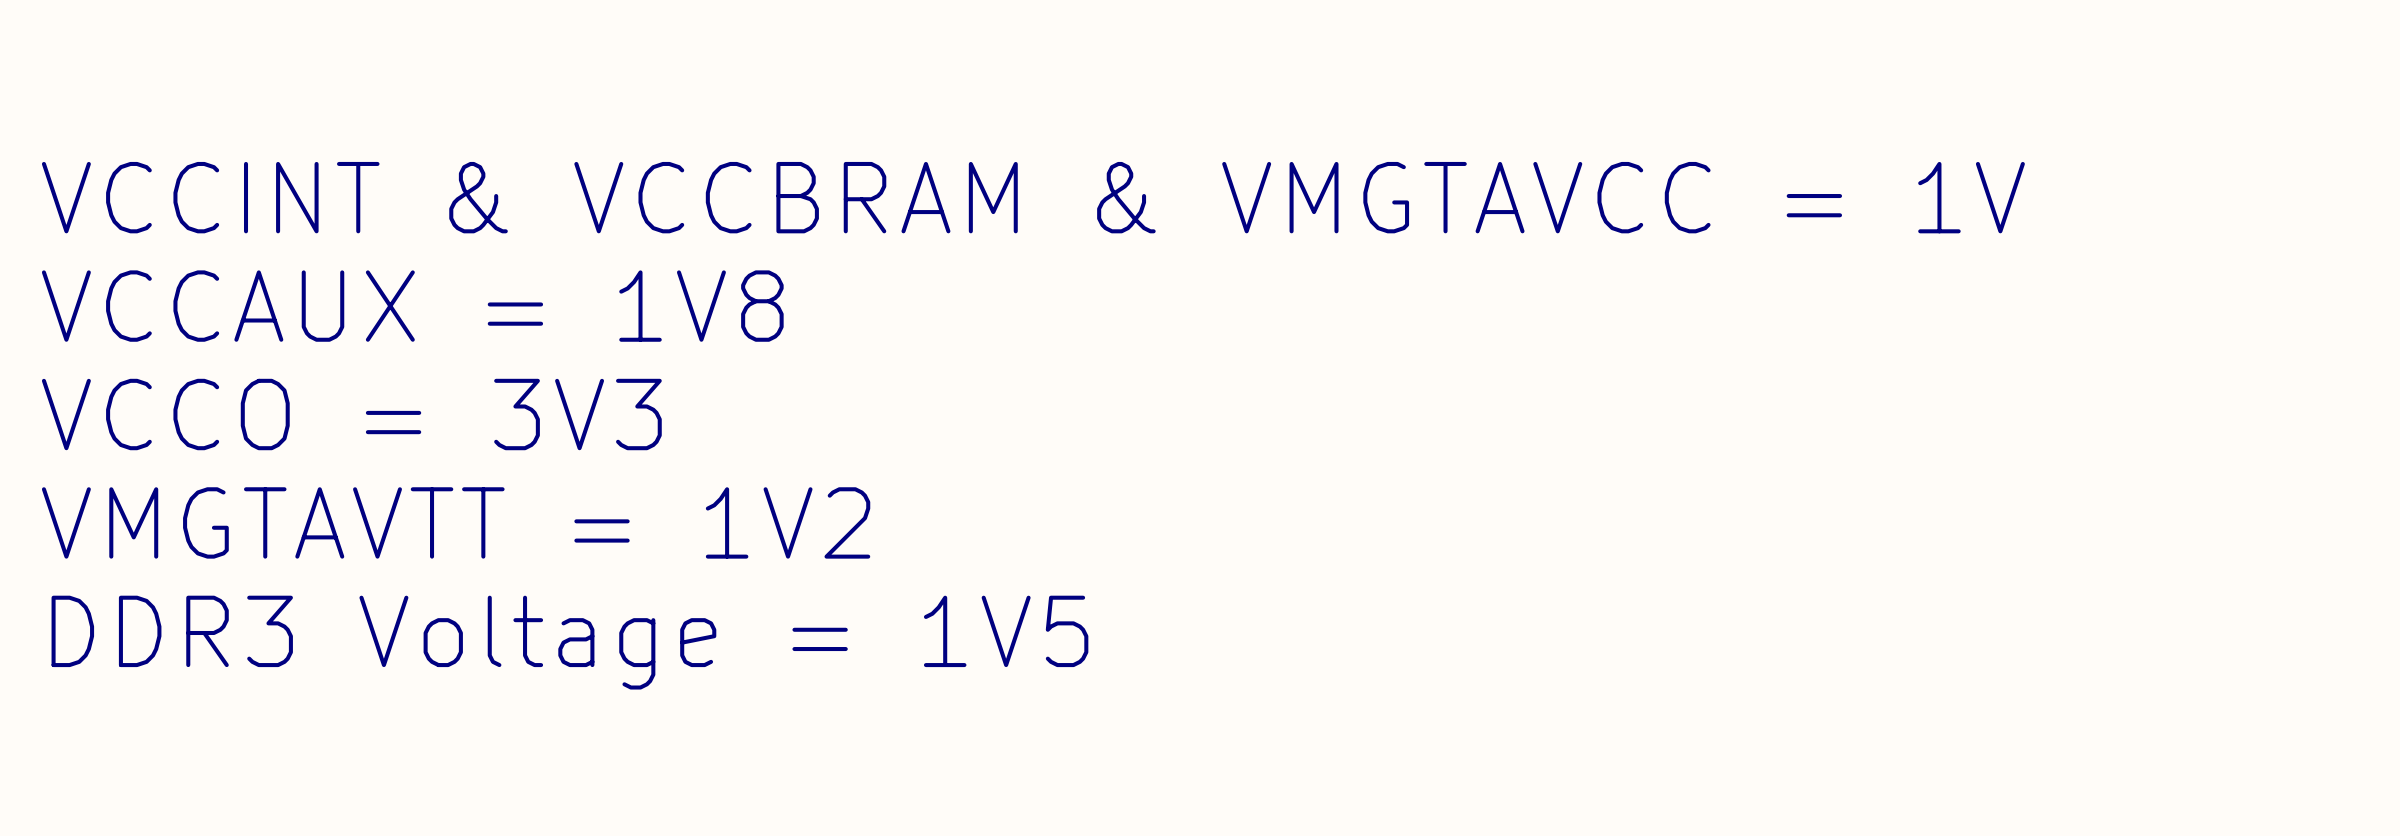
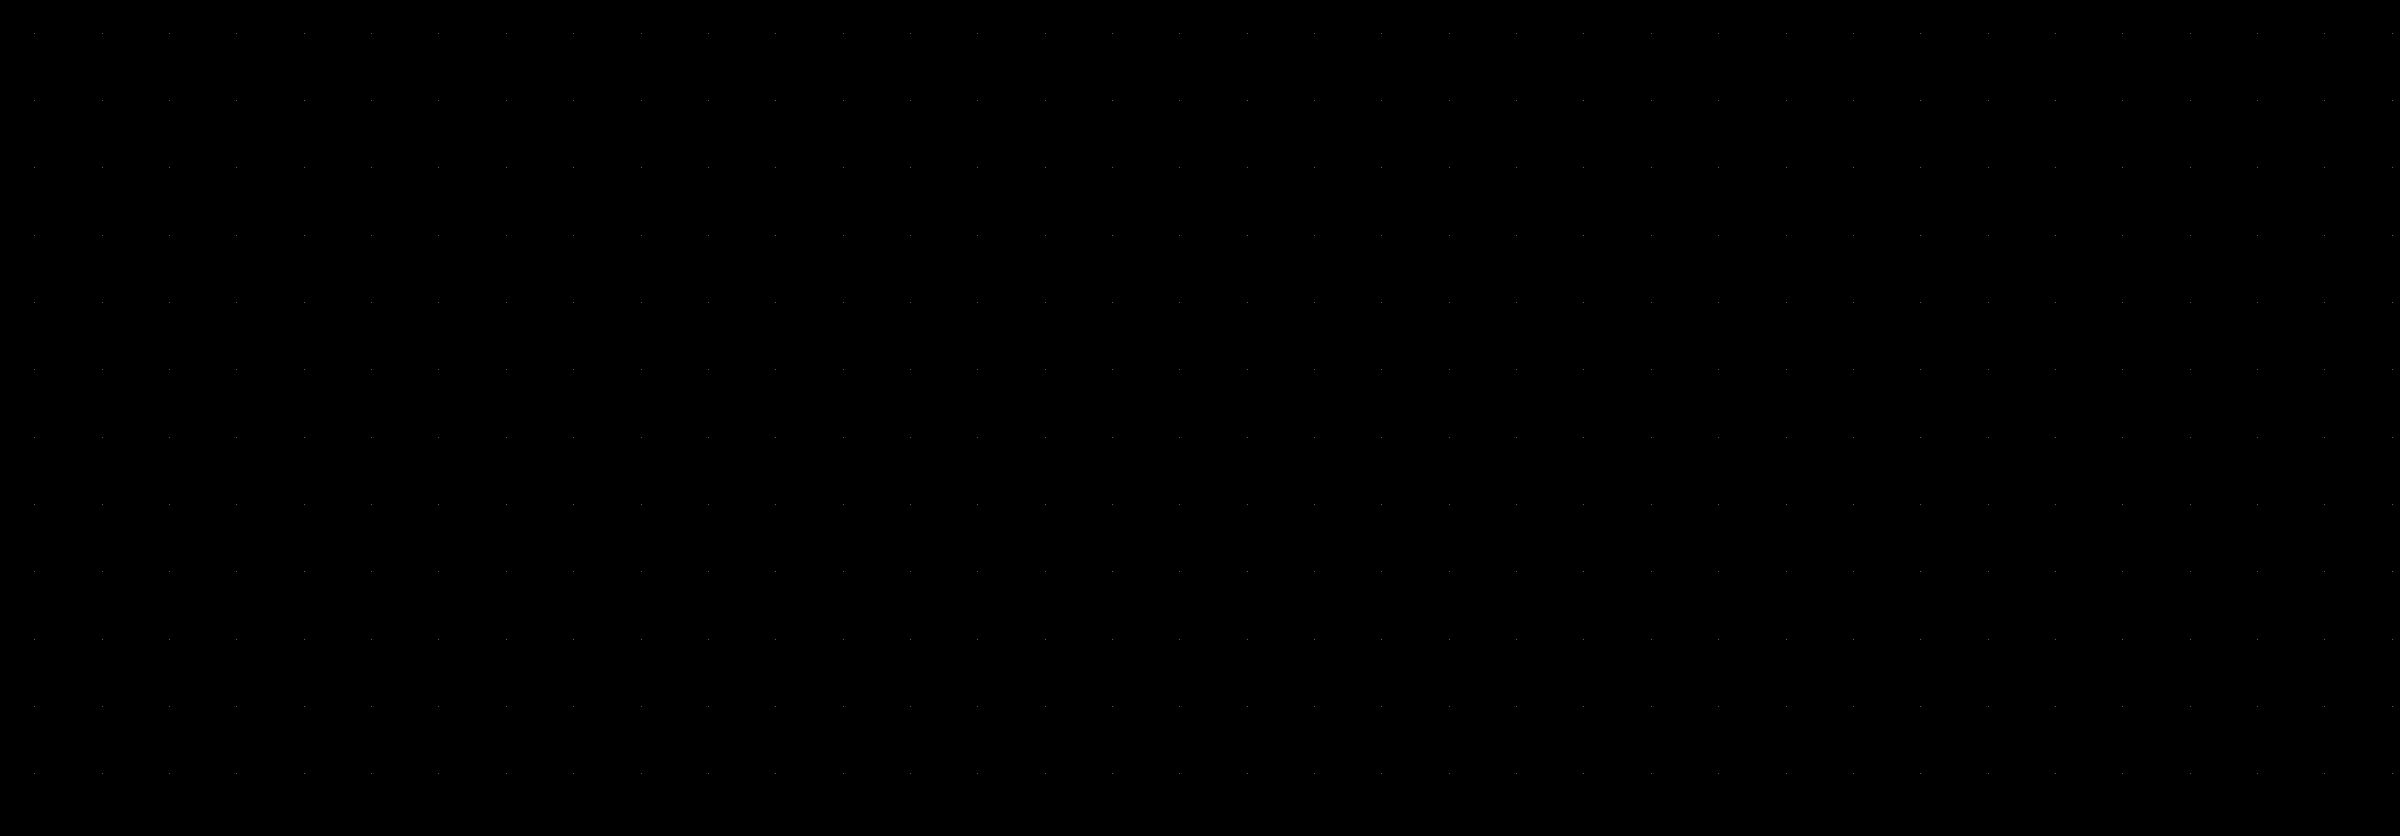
text: VCCINT & VCCBRAM & VMGTAVCC = 1V (1033, 197) -> none
text: VCCAUX = 1V8 (412, 306) -> none
text: VCCO = 3V3 (351, 414) -> none
text: VMGTAVTT = 1V2 (456, 522) -> none
text: DDR3 Voltage = 1V5 (569, 642) -> none

